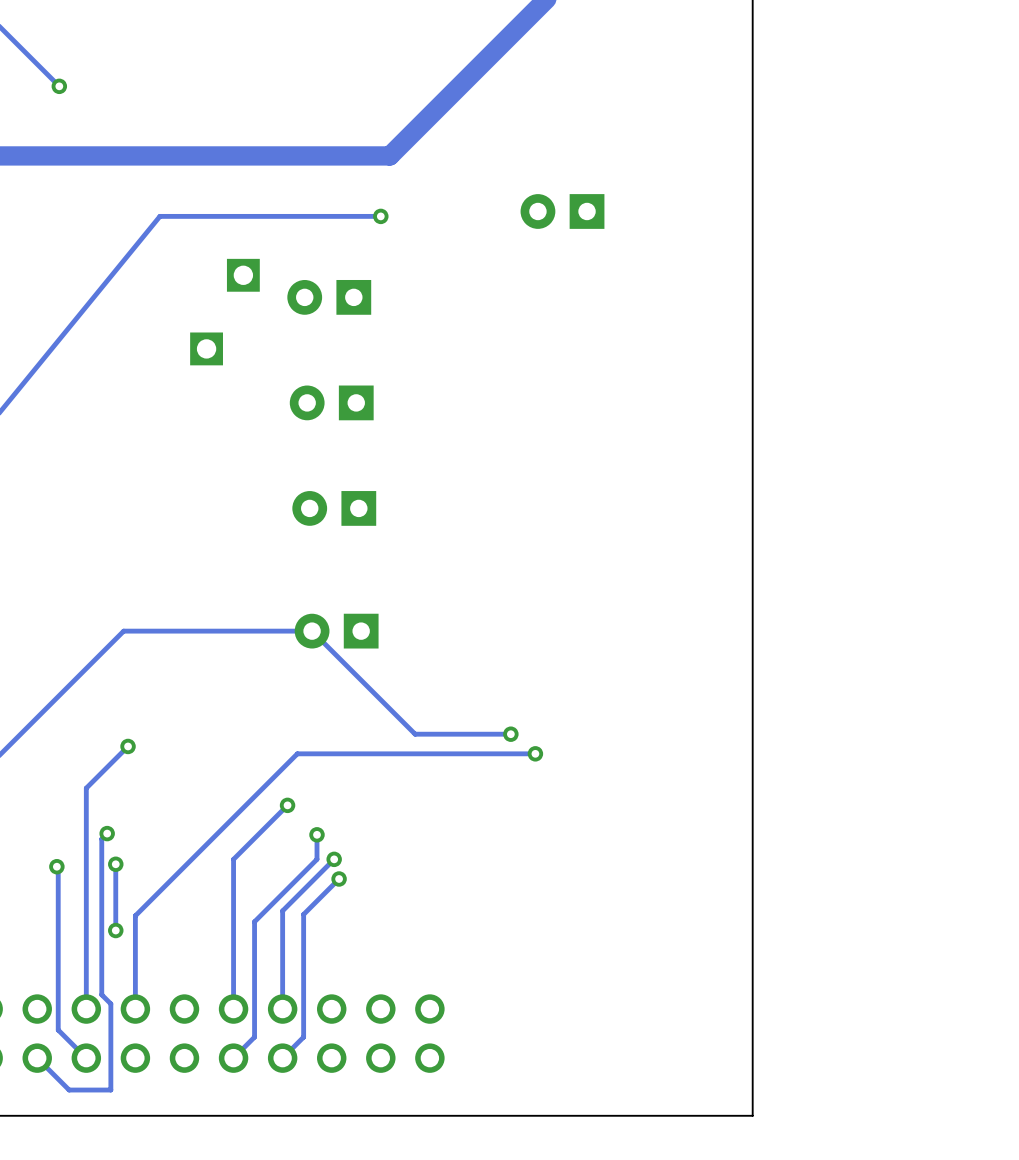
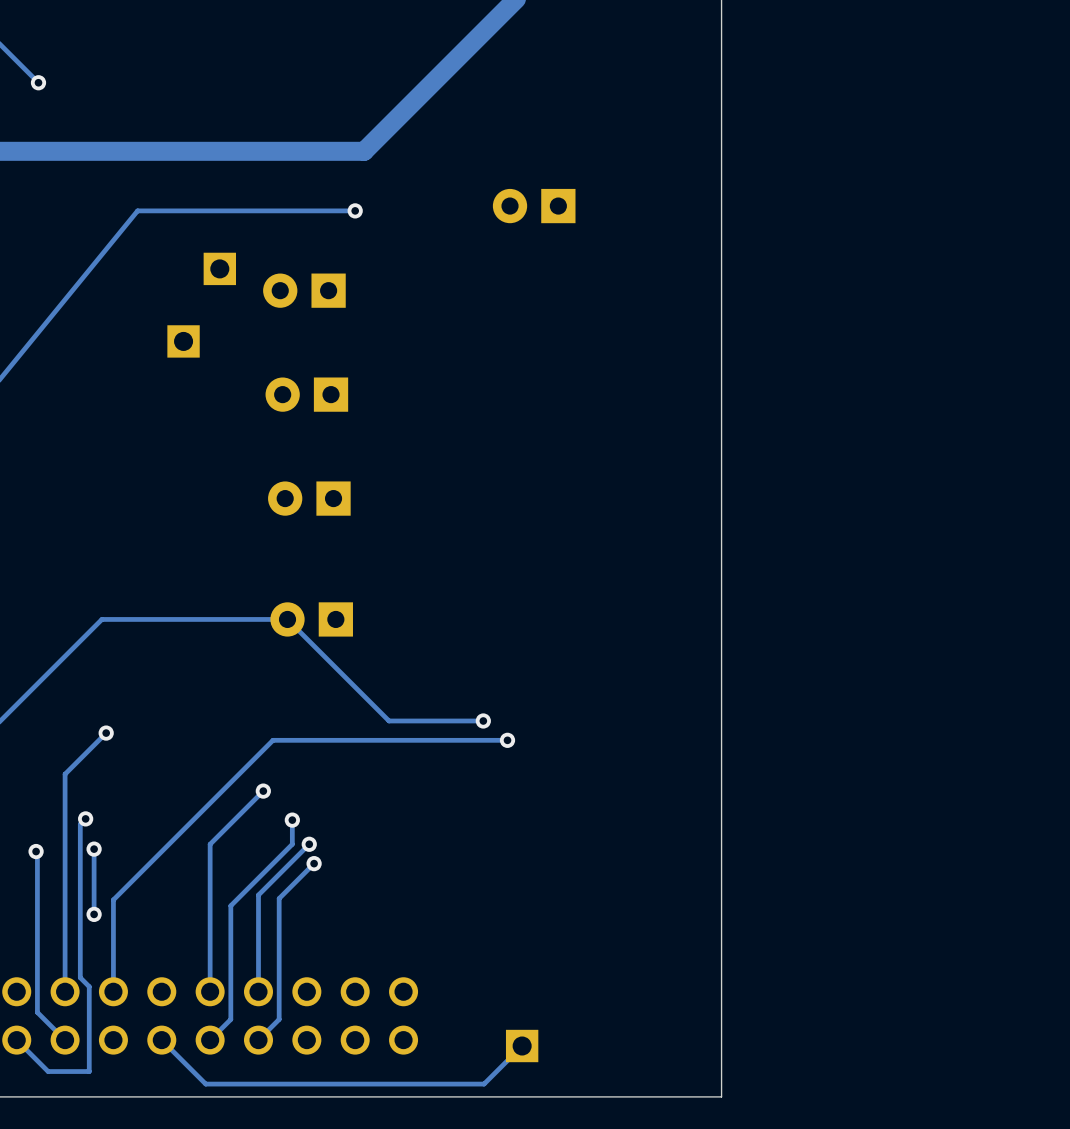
track: none -> (161, 1040) (205, 1084) (484, 1084) (522, 1046)
part: none -> (522, 1046)

